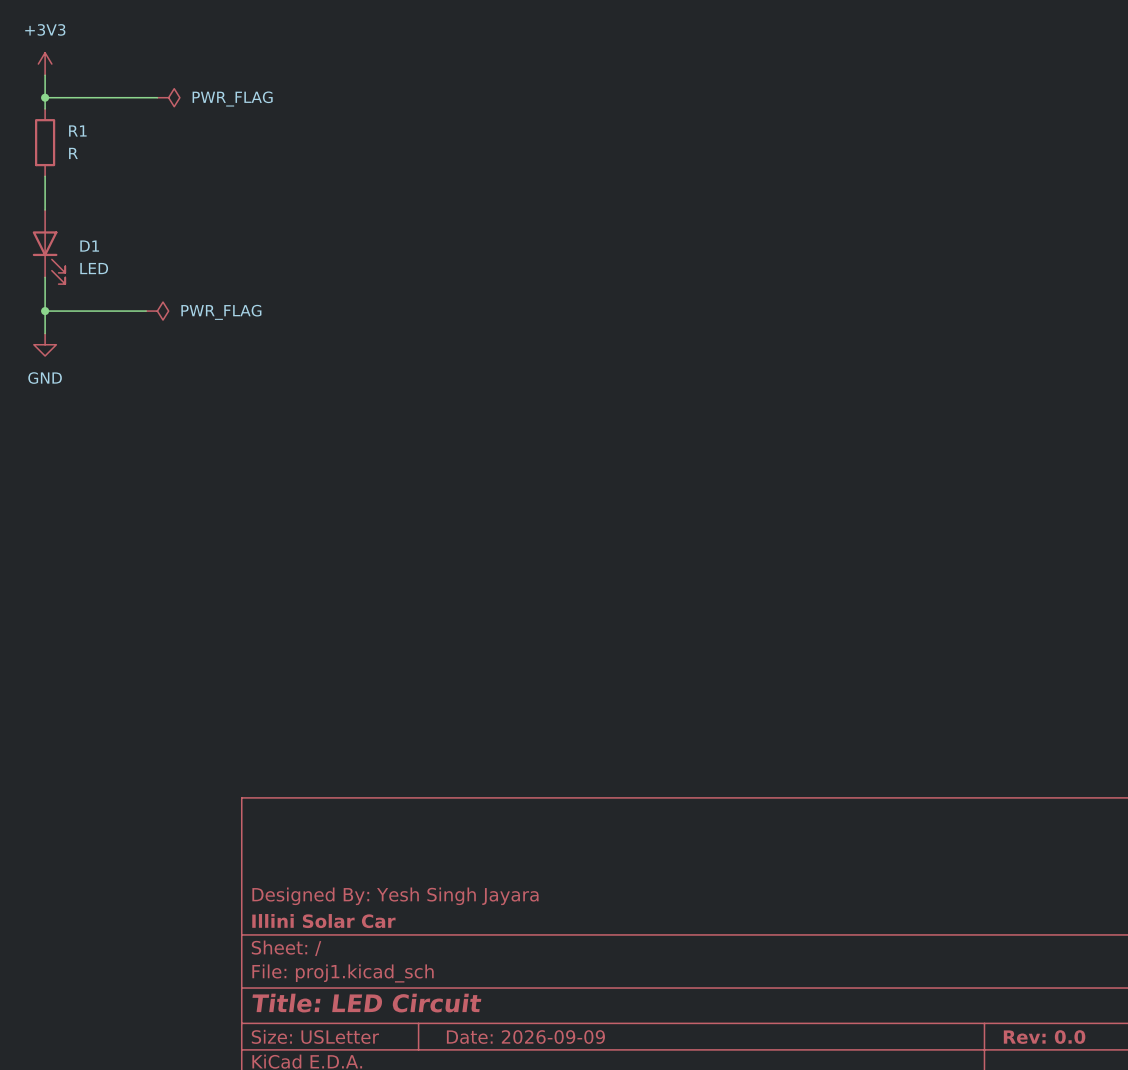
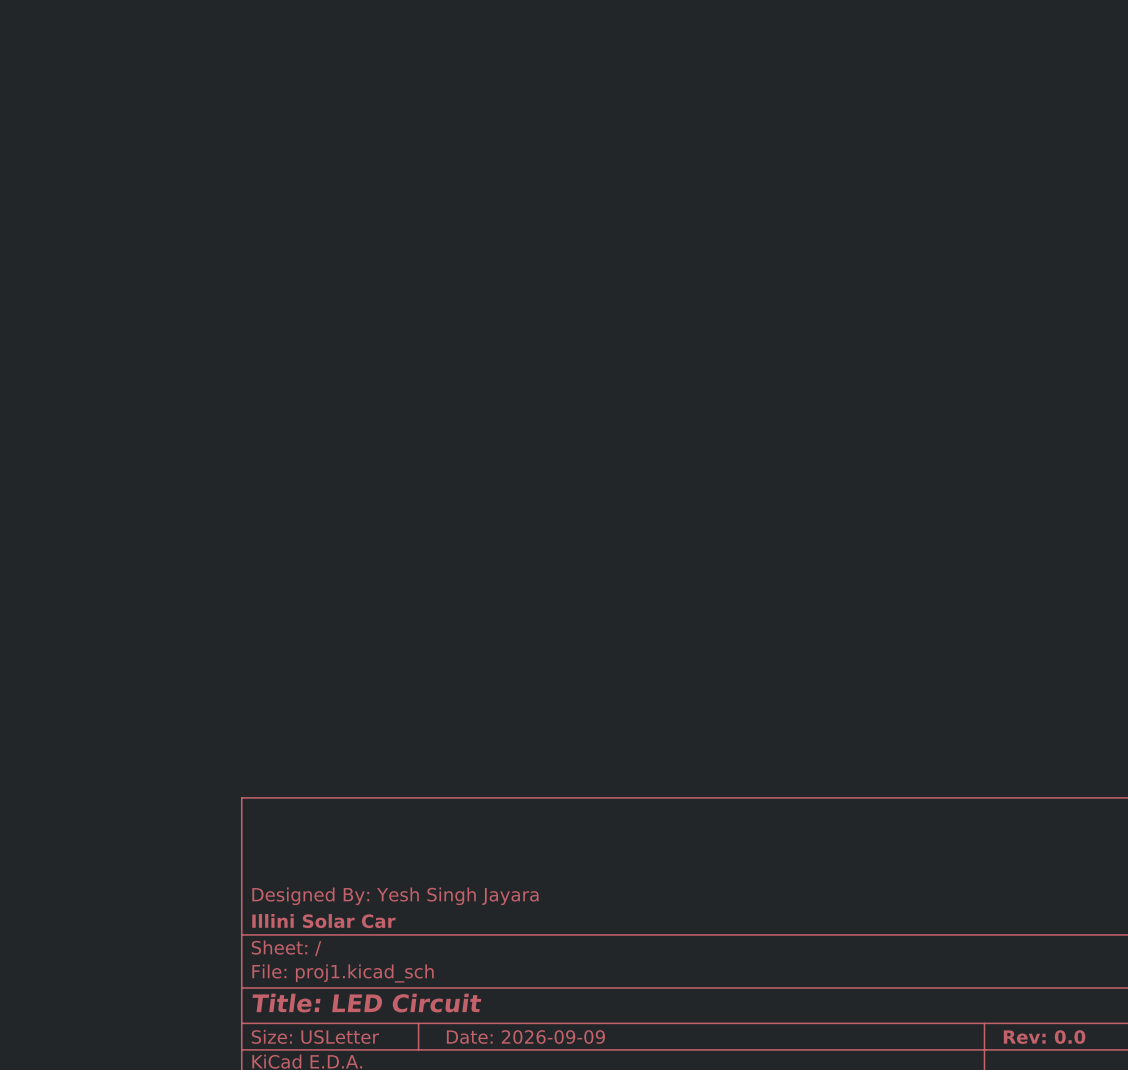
power symbol: +3V3 (45, 64) -> none
wire: (45, 75) (45, 108) -> none
wire: (45, 97) (157, 97) -> none
junction: (45, 97) -> none
power symbol: PWR_FLAG (168, 97) -> none
R1: R (45, 142) -> none
wire: (45, 176) (45, 210) -> none
D1: LED (49, 247) -> none
wire: (45, 277) (45, 333) -> none
wire: (45, 311) (146, 311) -> none
junction: (45, 311) -> none
power symbol: PWR_FLAG (157, 311) -> none
power symbol: GND (45, 344) -> none

